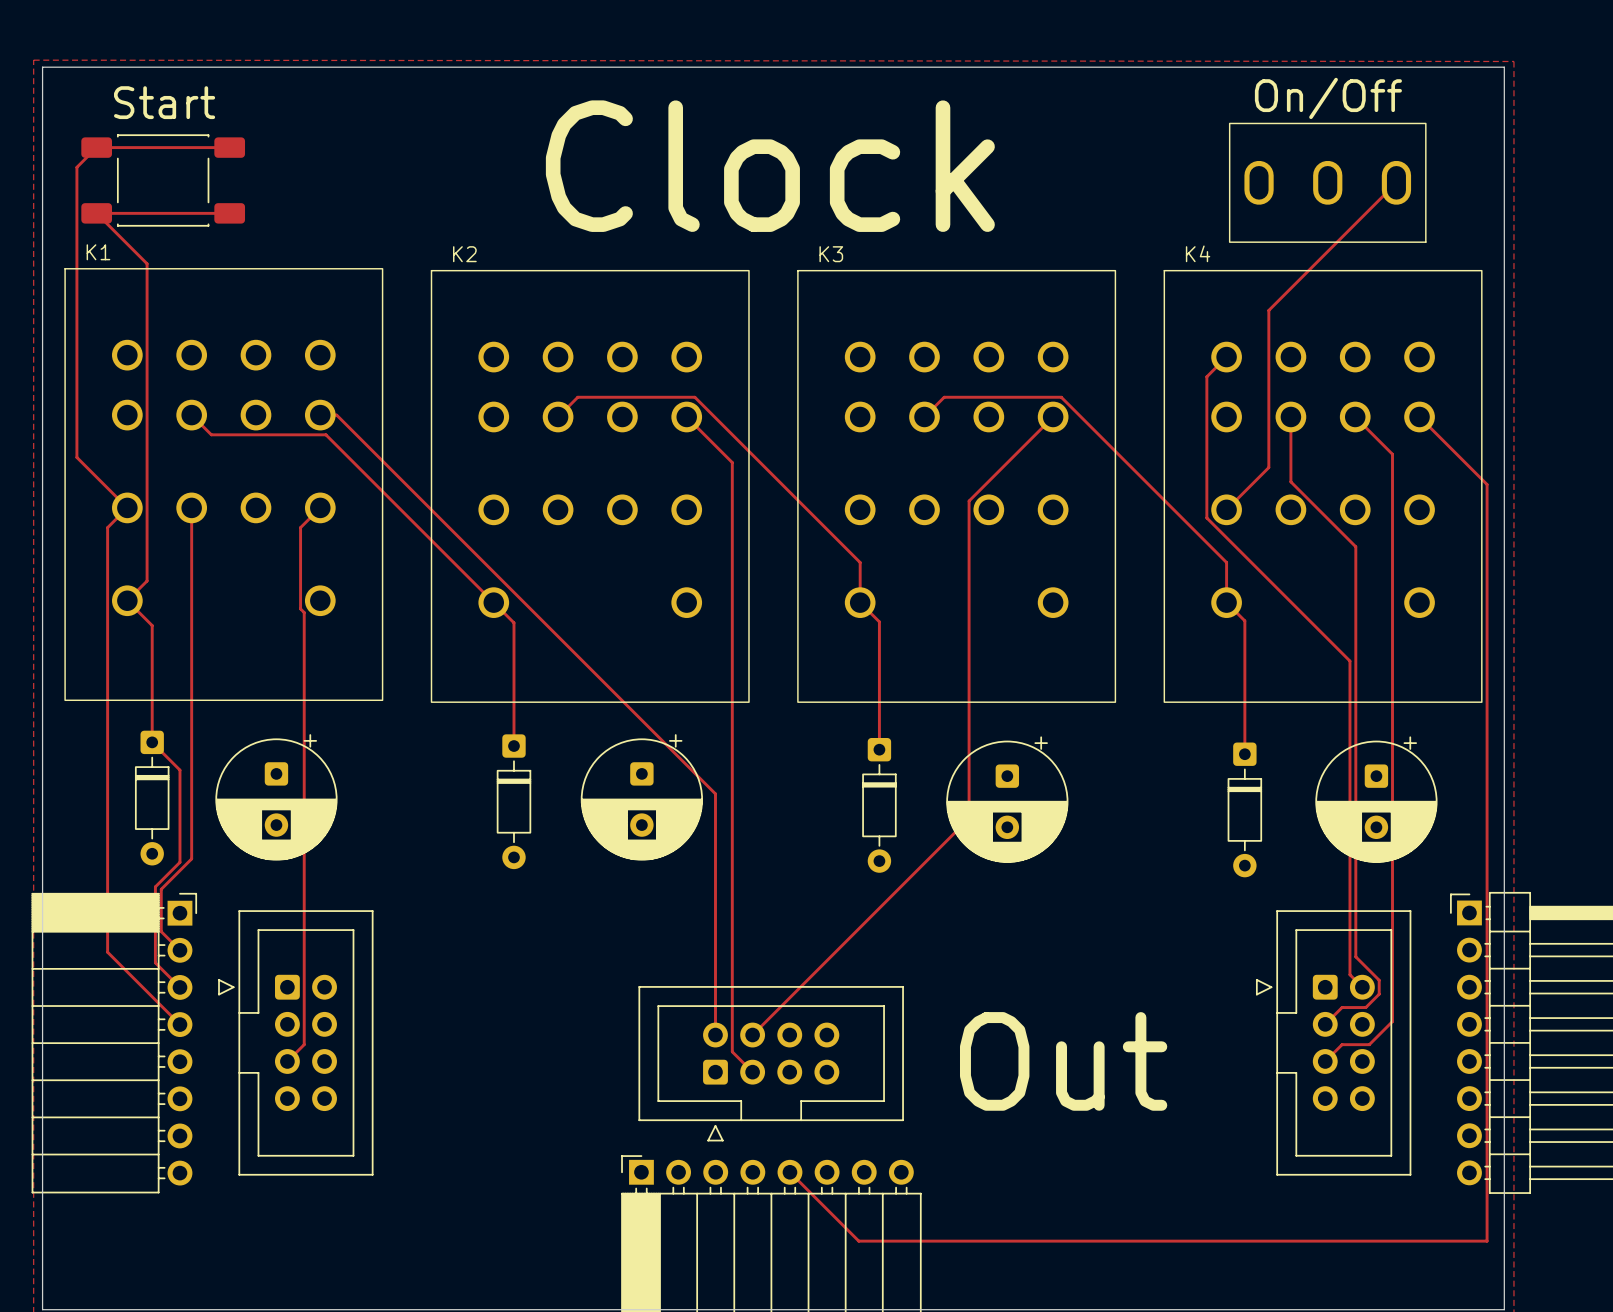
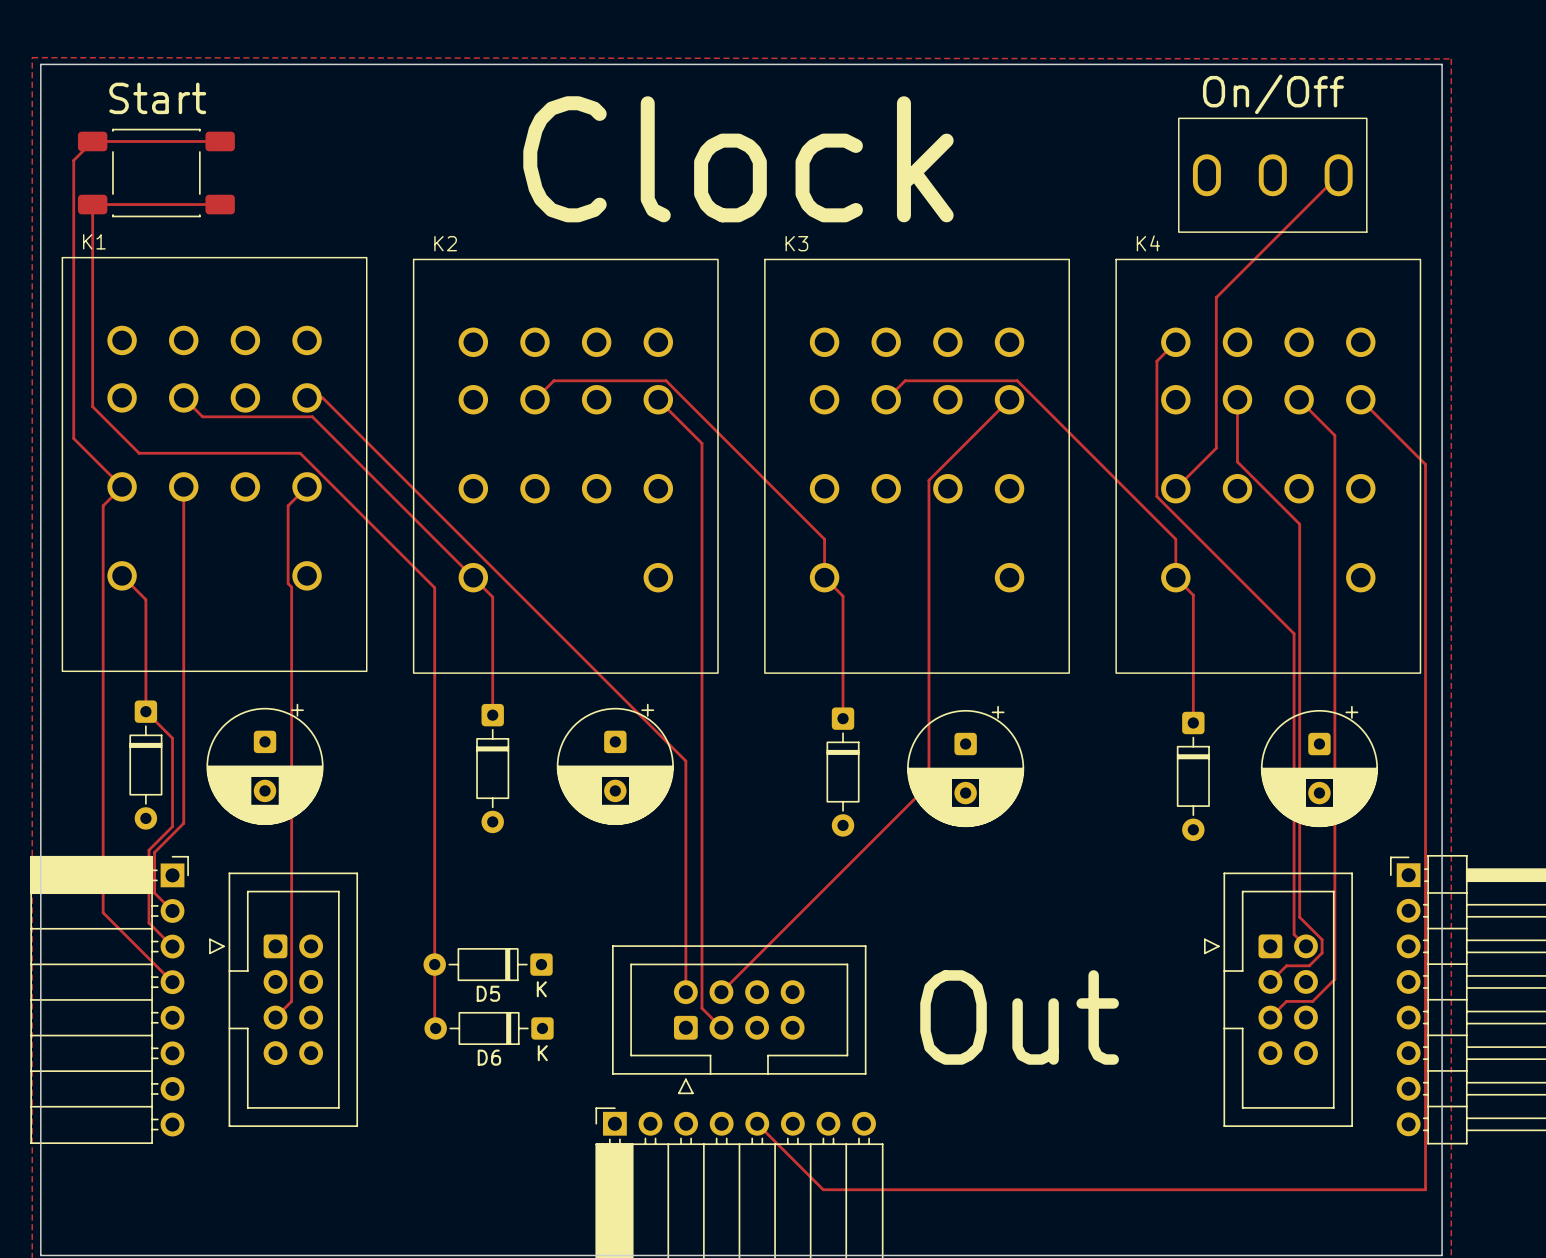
track: (96, 213) (147, 263) (147, 581) (127, 600) -> (92, 204) (92, 406) (139, 453) (300, 453) (434, 587) (435, 1028)
D5: none -> (488, 964)
D6: none -> (489, 1028)

